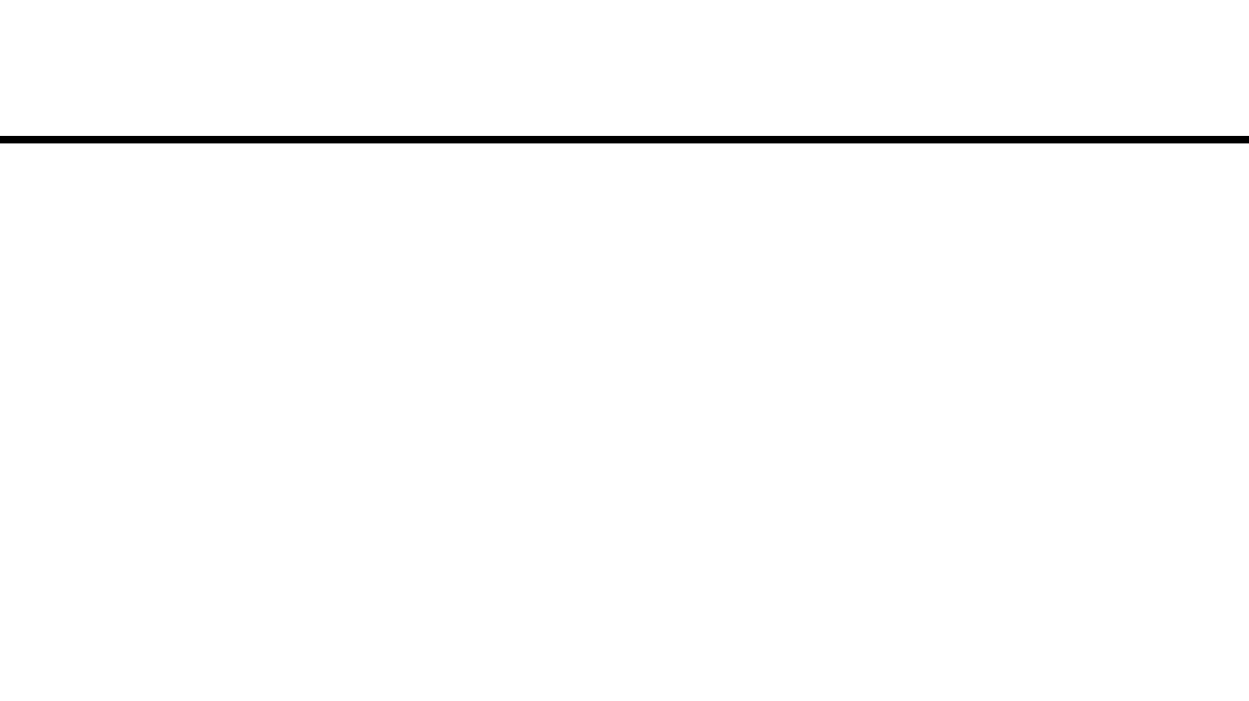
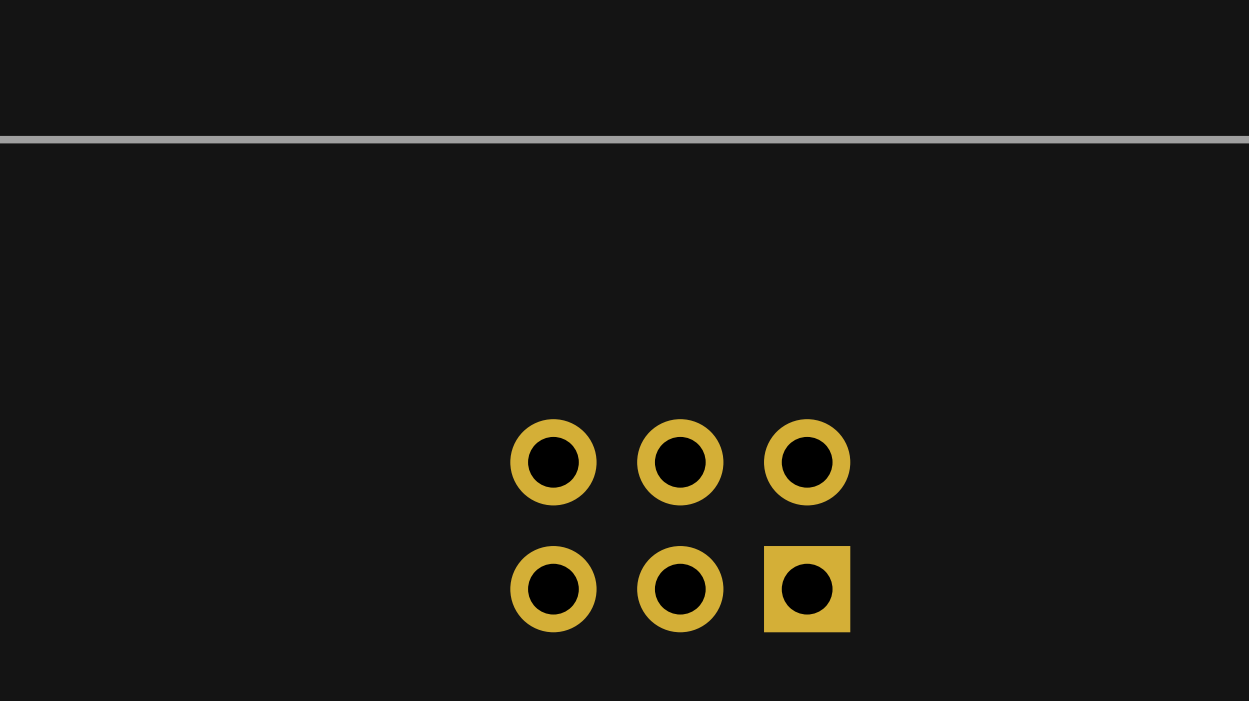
part: none -> (680, 525)

